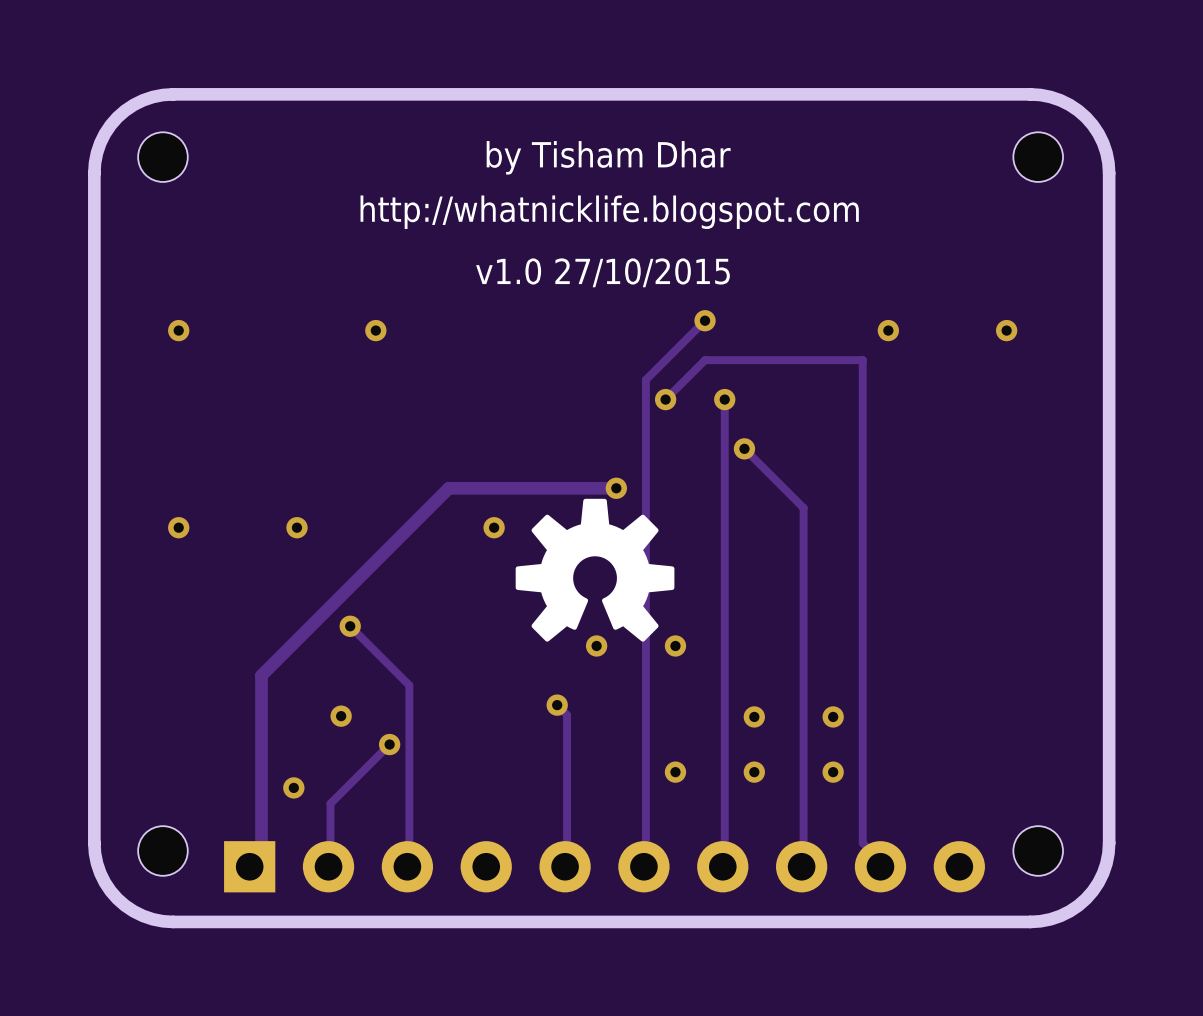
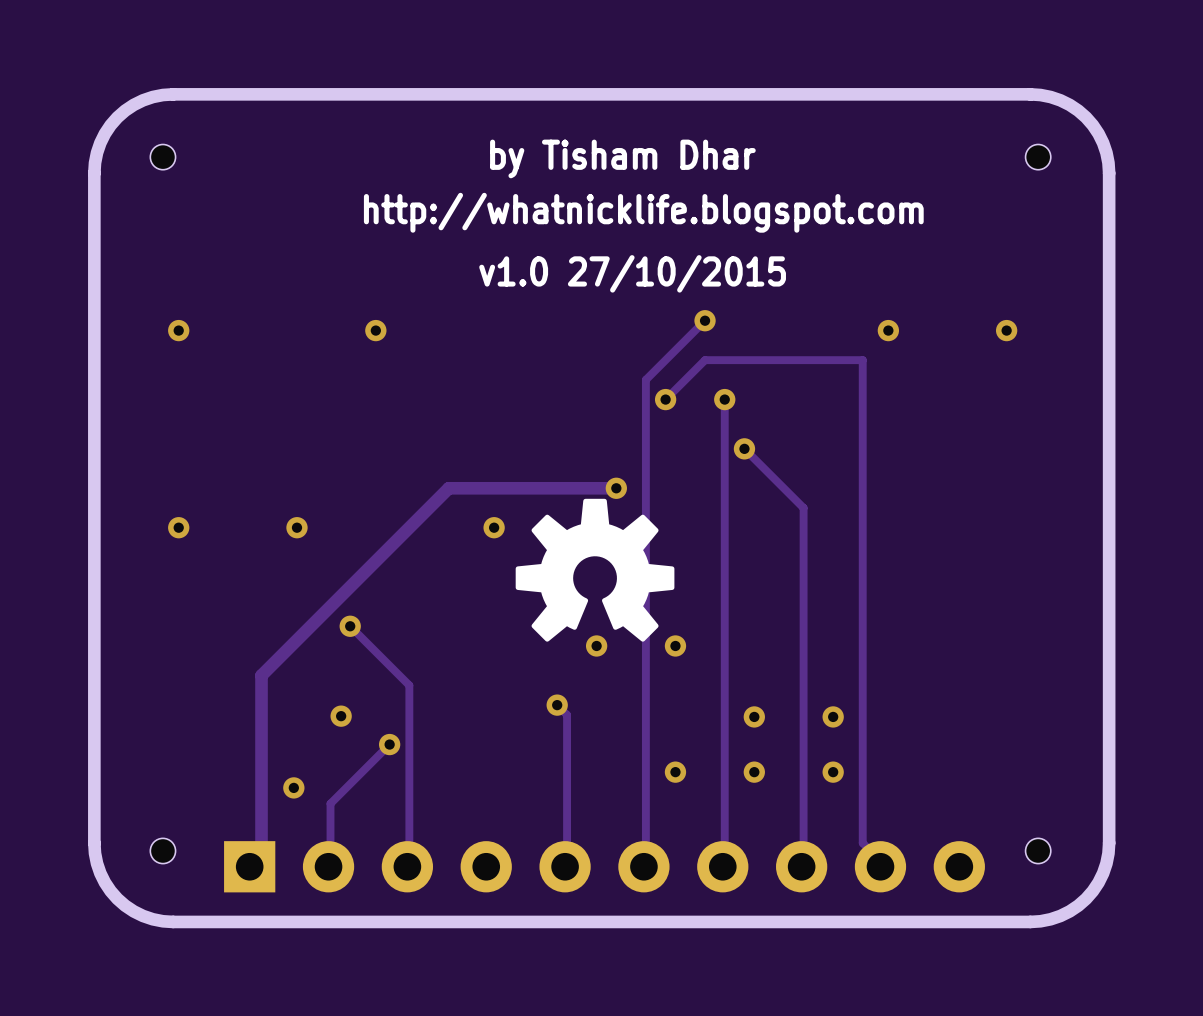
hole size: [138, 132, 188, 182] -> [150, 144, 176, 170]
hole size: [1013, 132, 1064, 182] -> [1025, 144, 1051, 170]
hole size: [138, 826, 188, 876] -> [150, 838, 176, 864]
hole size: [1013, 826, 1064, 876] -> [1025, 838, 1051, 864]

